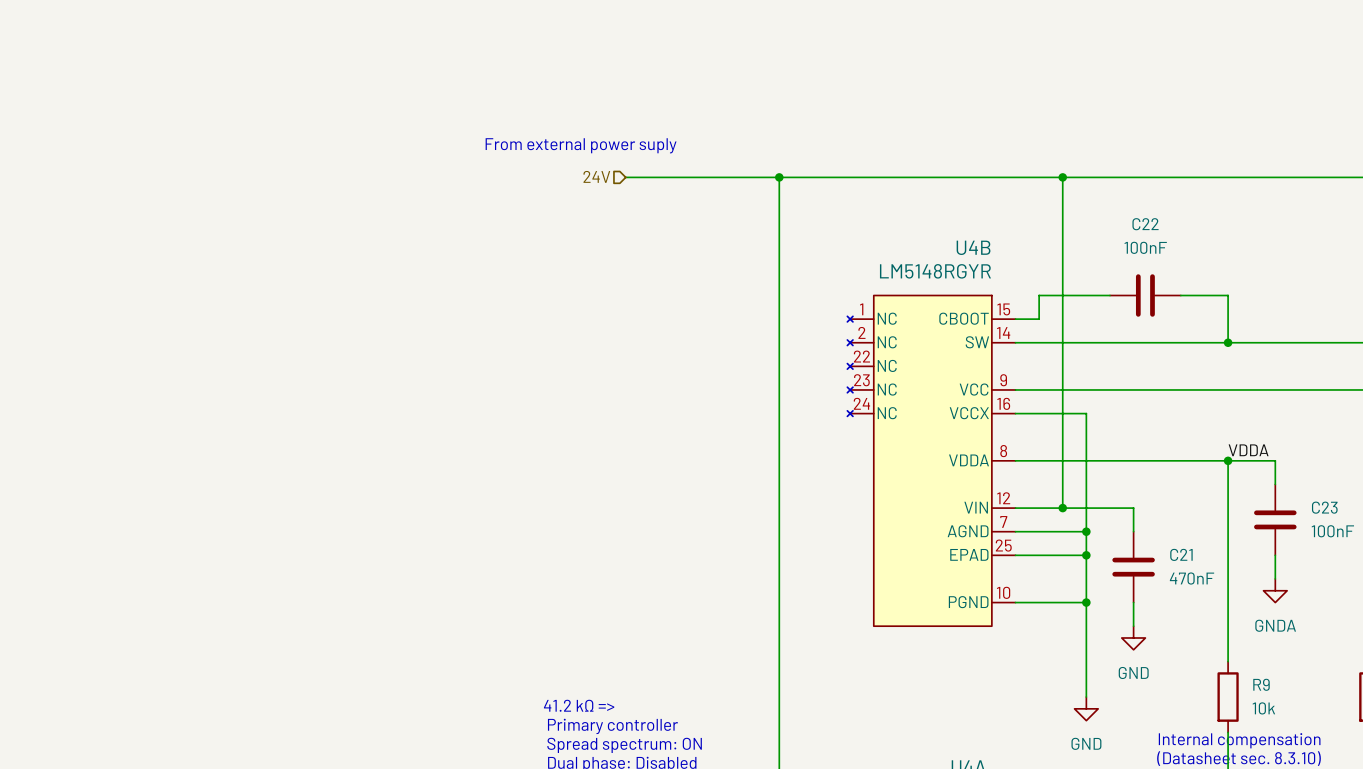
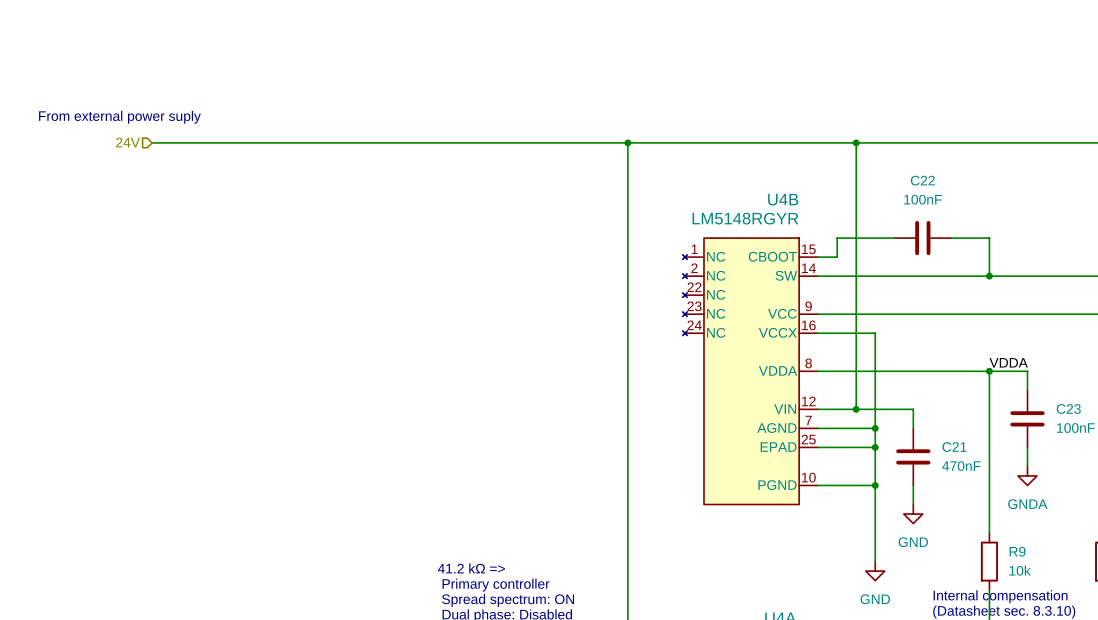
text: none -> From external power suply (119, 117)
text: From external power suply (581, 145) -> none
hierarchical label: none -> 24V (128, 142)
hierarchical label: 24V (596, 176) -> none
wire: none -> (152, 142) (504, 142)

